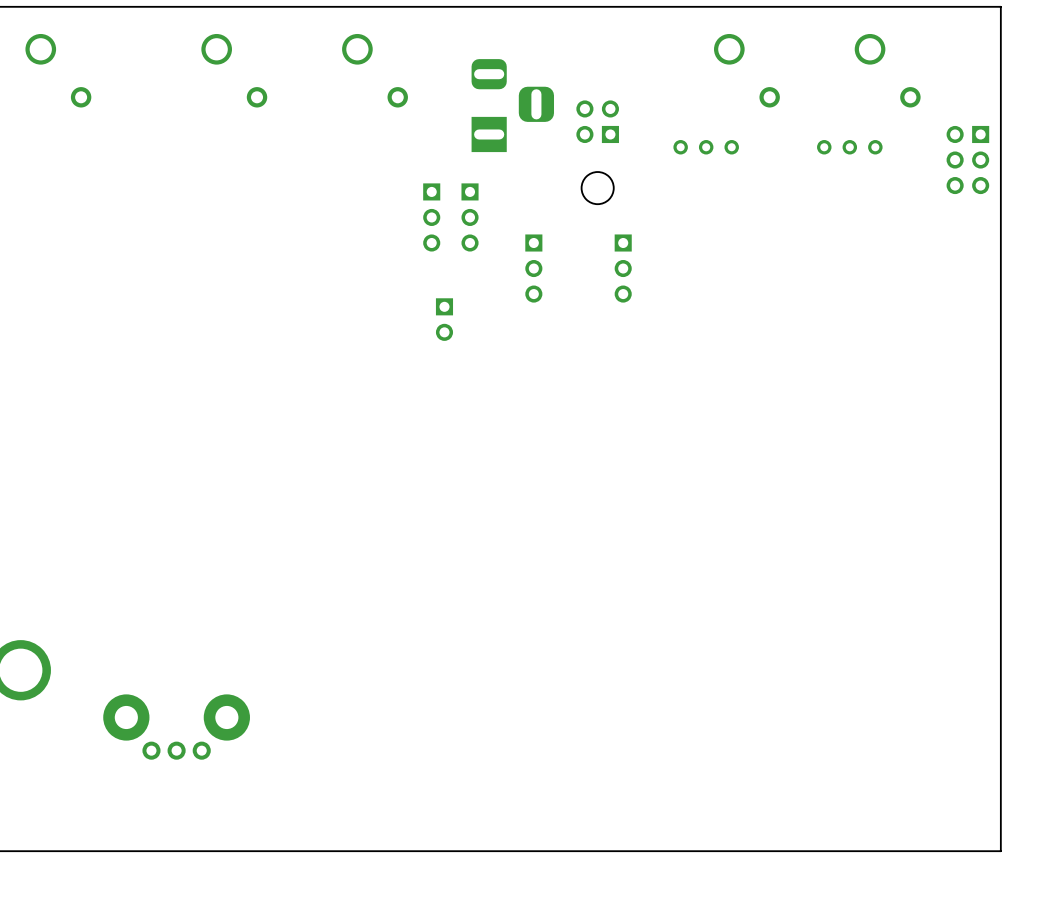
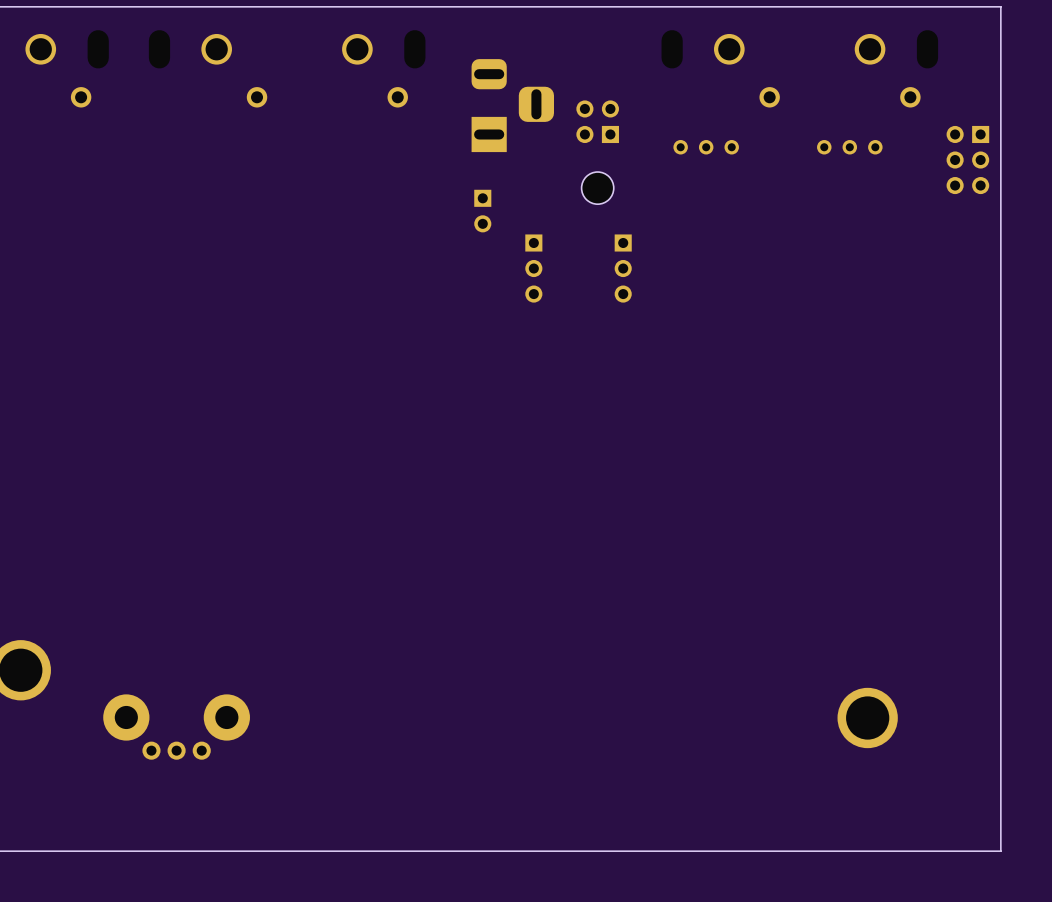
part: (431, 217) -> none
part: (470, 217) -> none
part position: (444, 319) -> (482, 211)
part: none -> (867, 717)

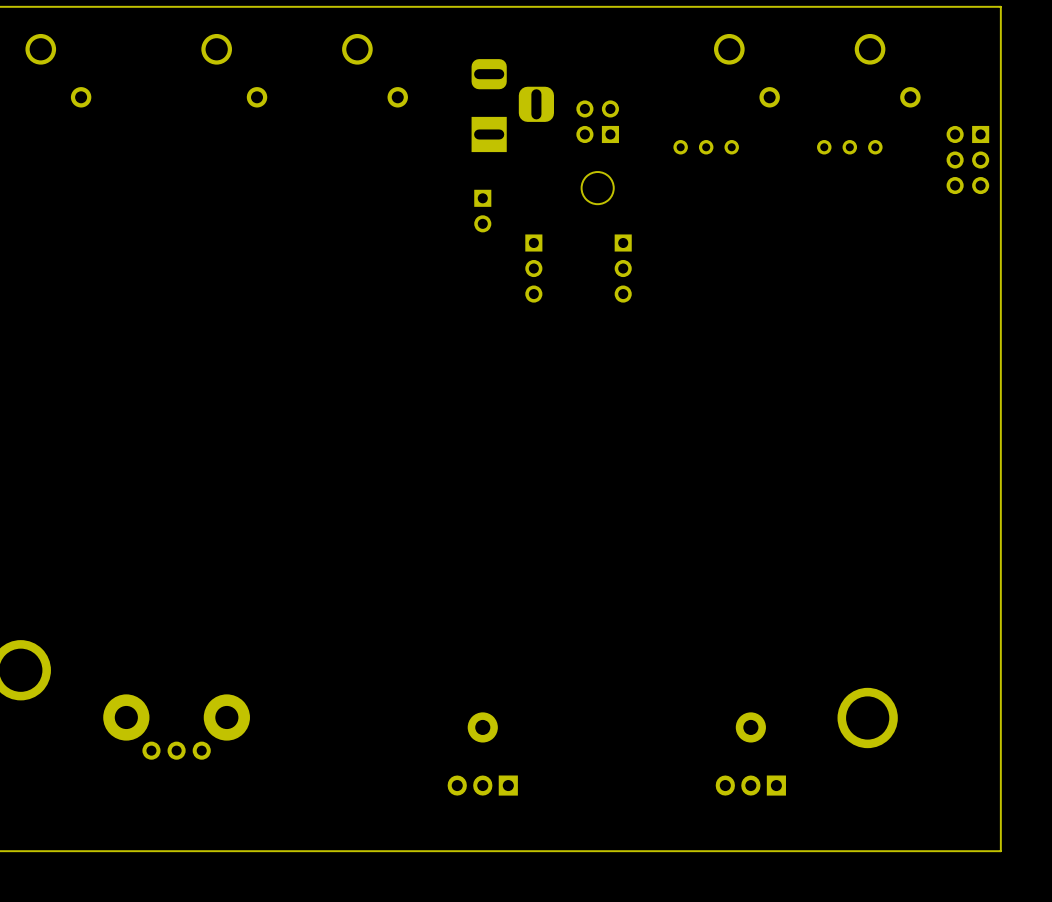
part: none -> (482, 727)
part: none -> (750, 727)
part: none -> (482, 785)
part: none -> (750, 785)

